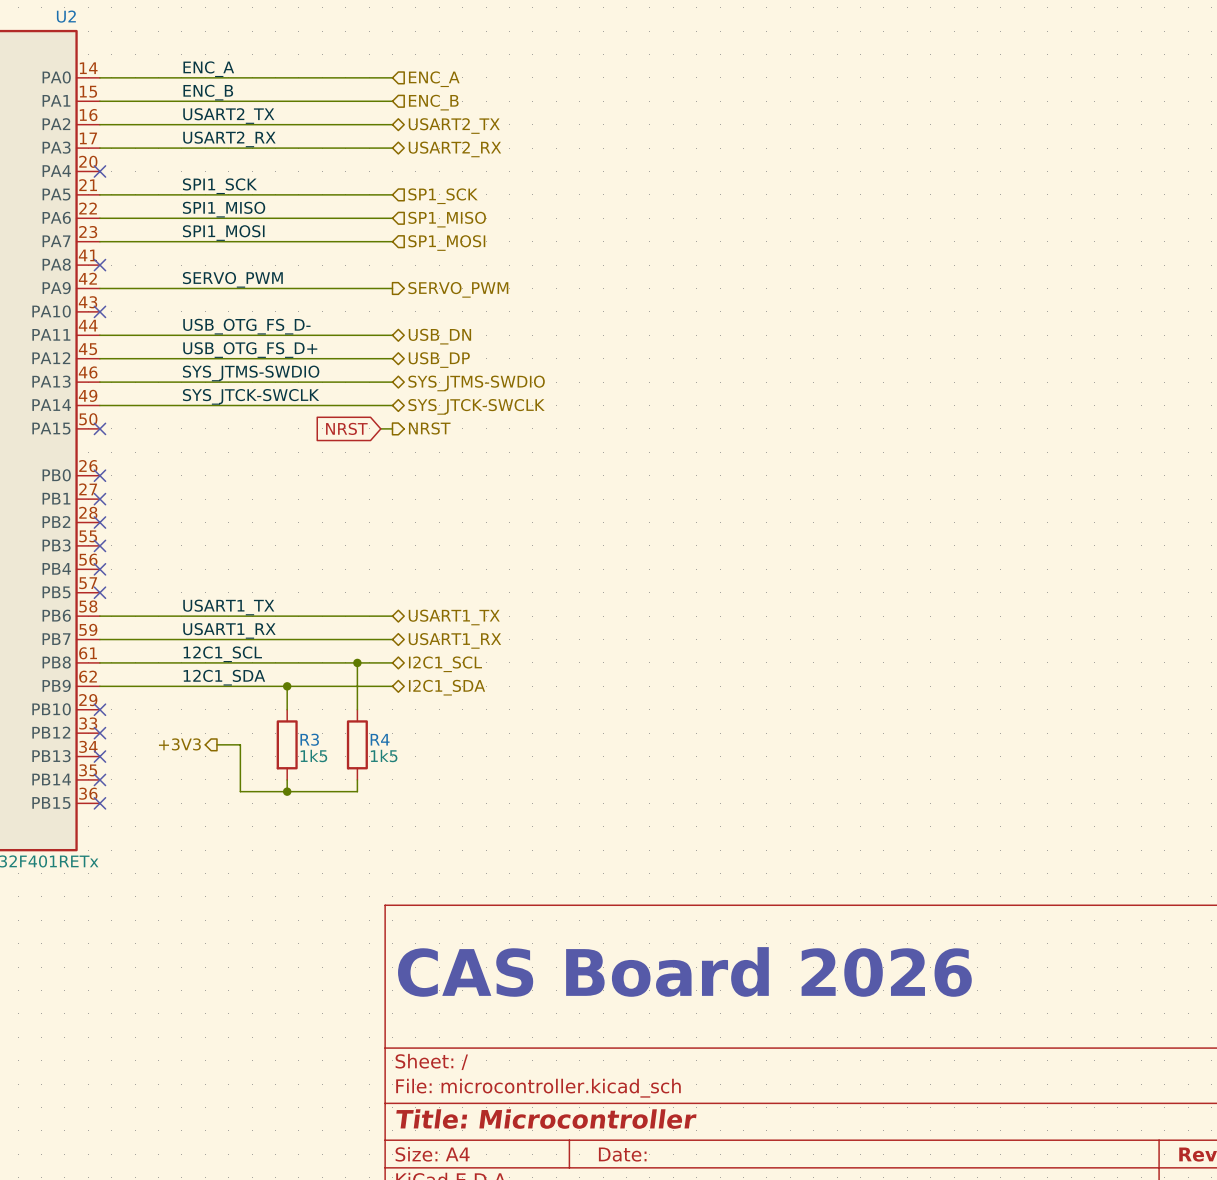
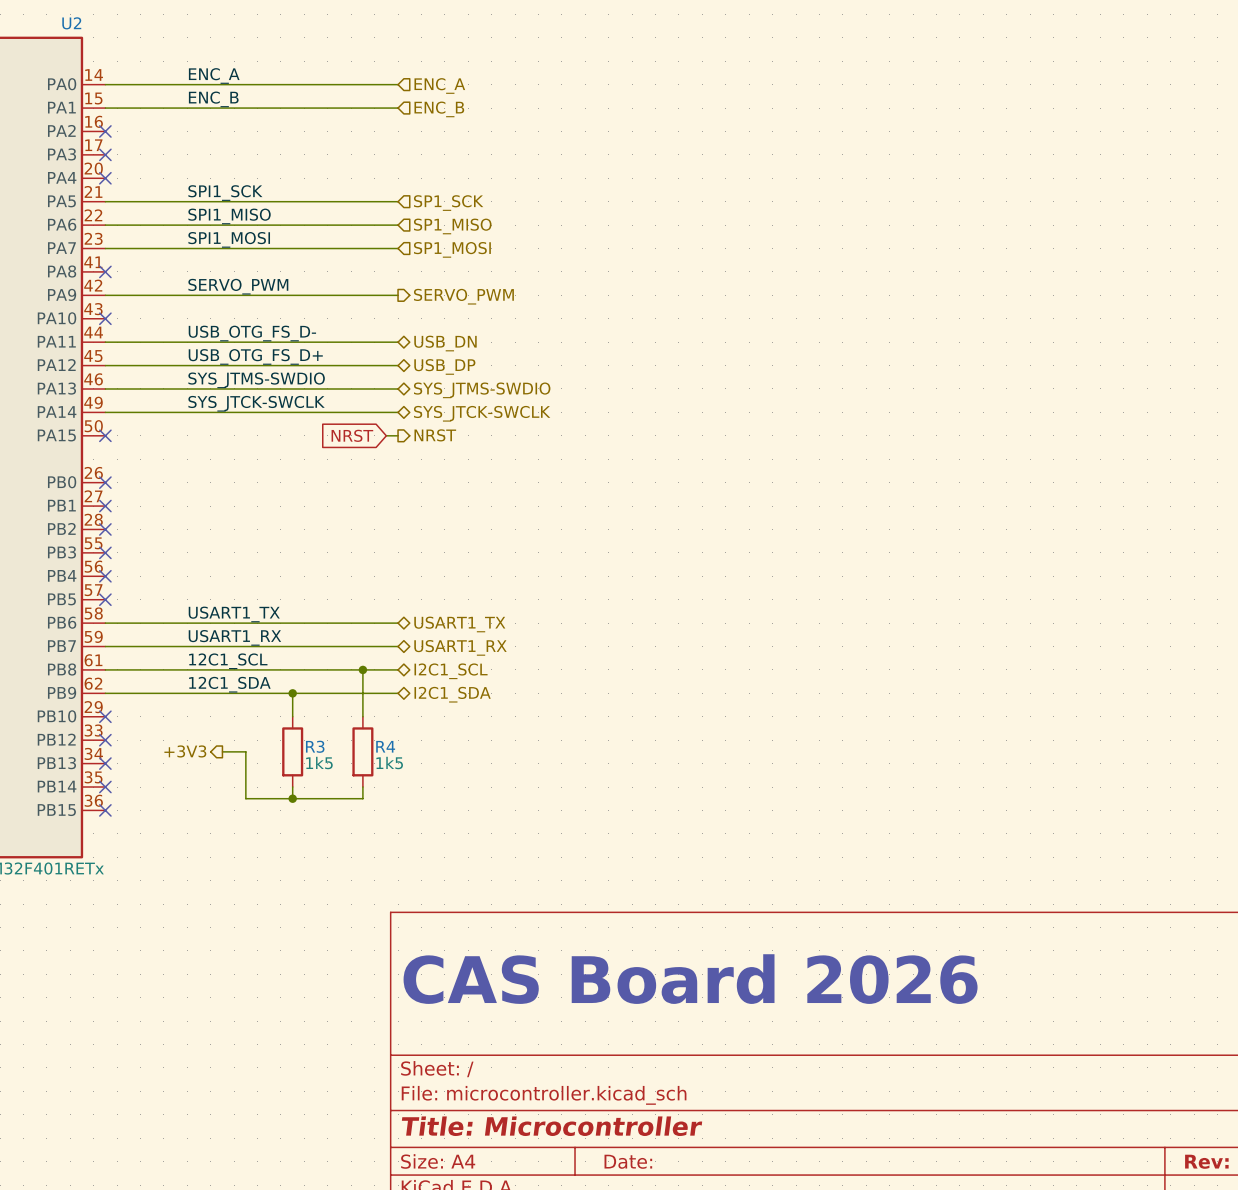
label: USART2_TX (228, 116) -> none
wire: (99, 124) (392, 124) -> none
no-connect mark: none -> (105, 131)
hierarchical label: USART2_TX (454, 126) -> none
label: USART2_RX (229, 139) -> none
wire: (99, 148) (392, 148) -> none
no-connect mark: none -> (105, 154)
hierarchical label: USART2_RX (454, 149) -> none

